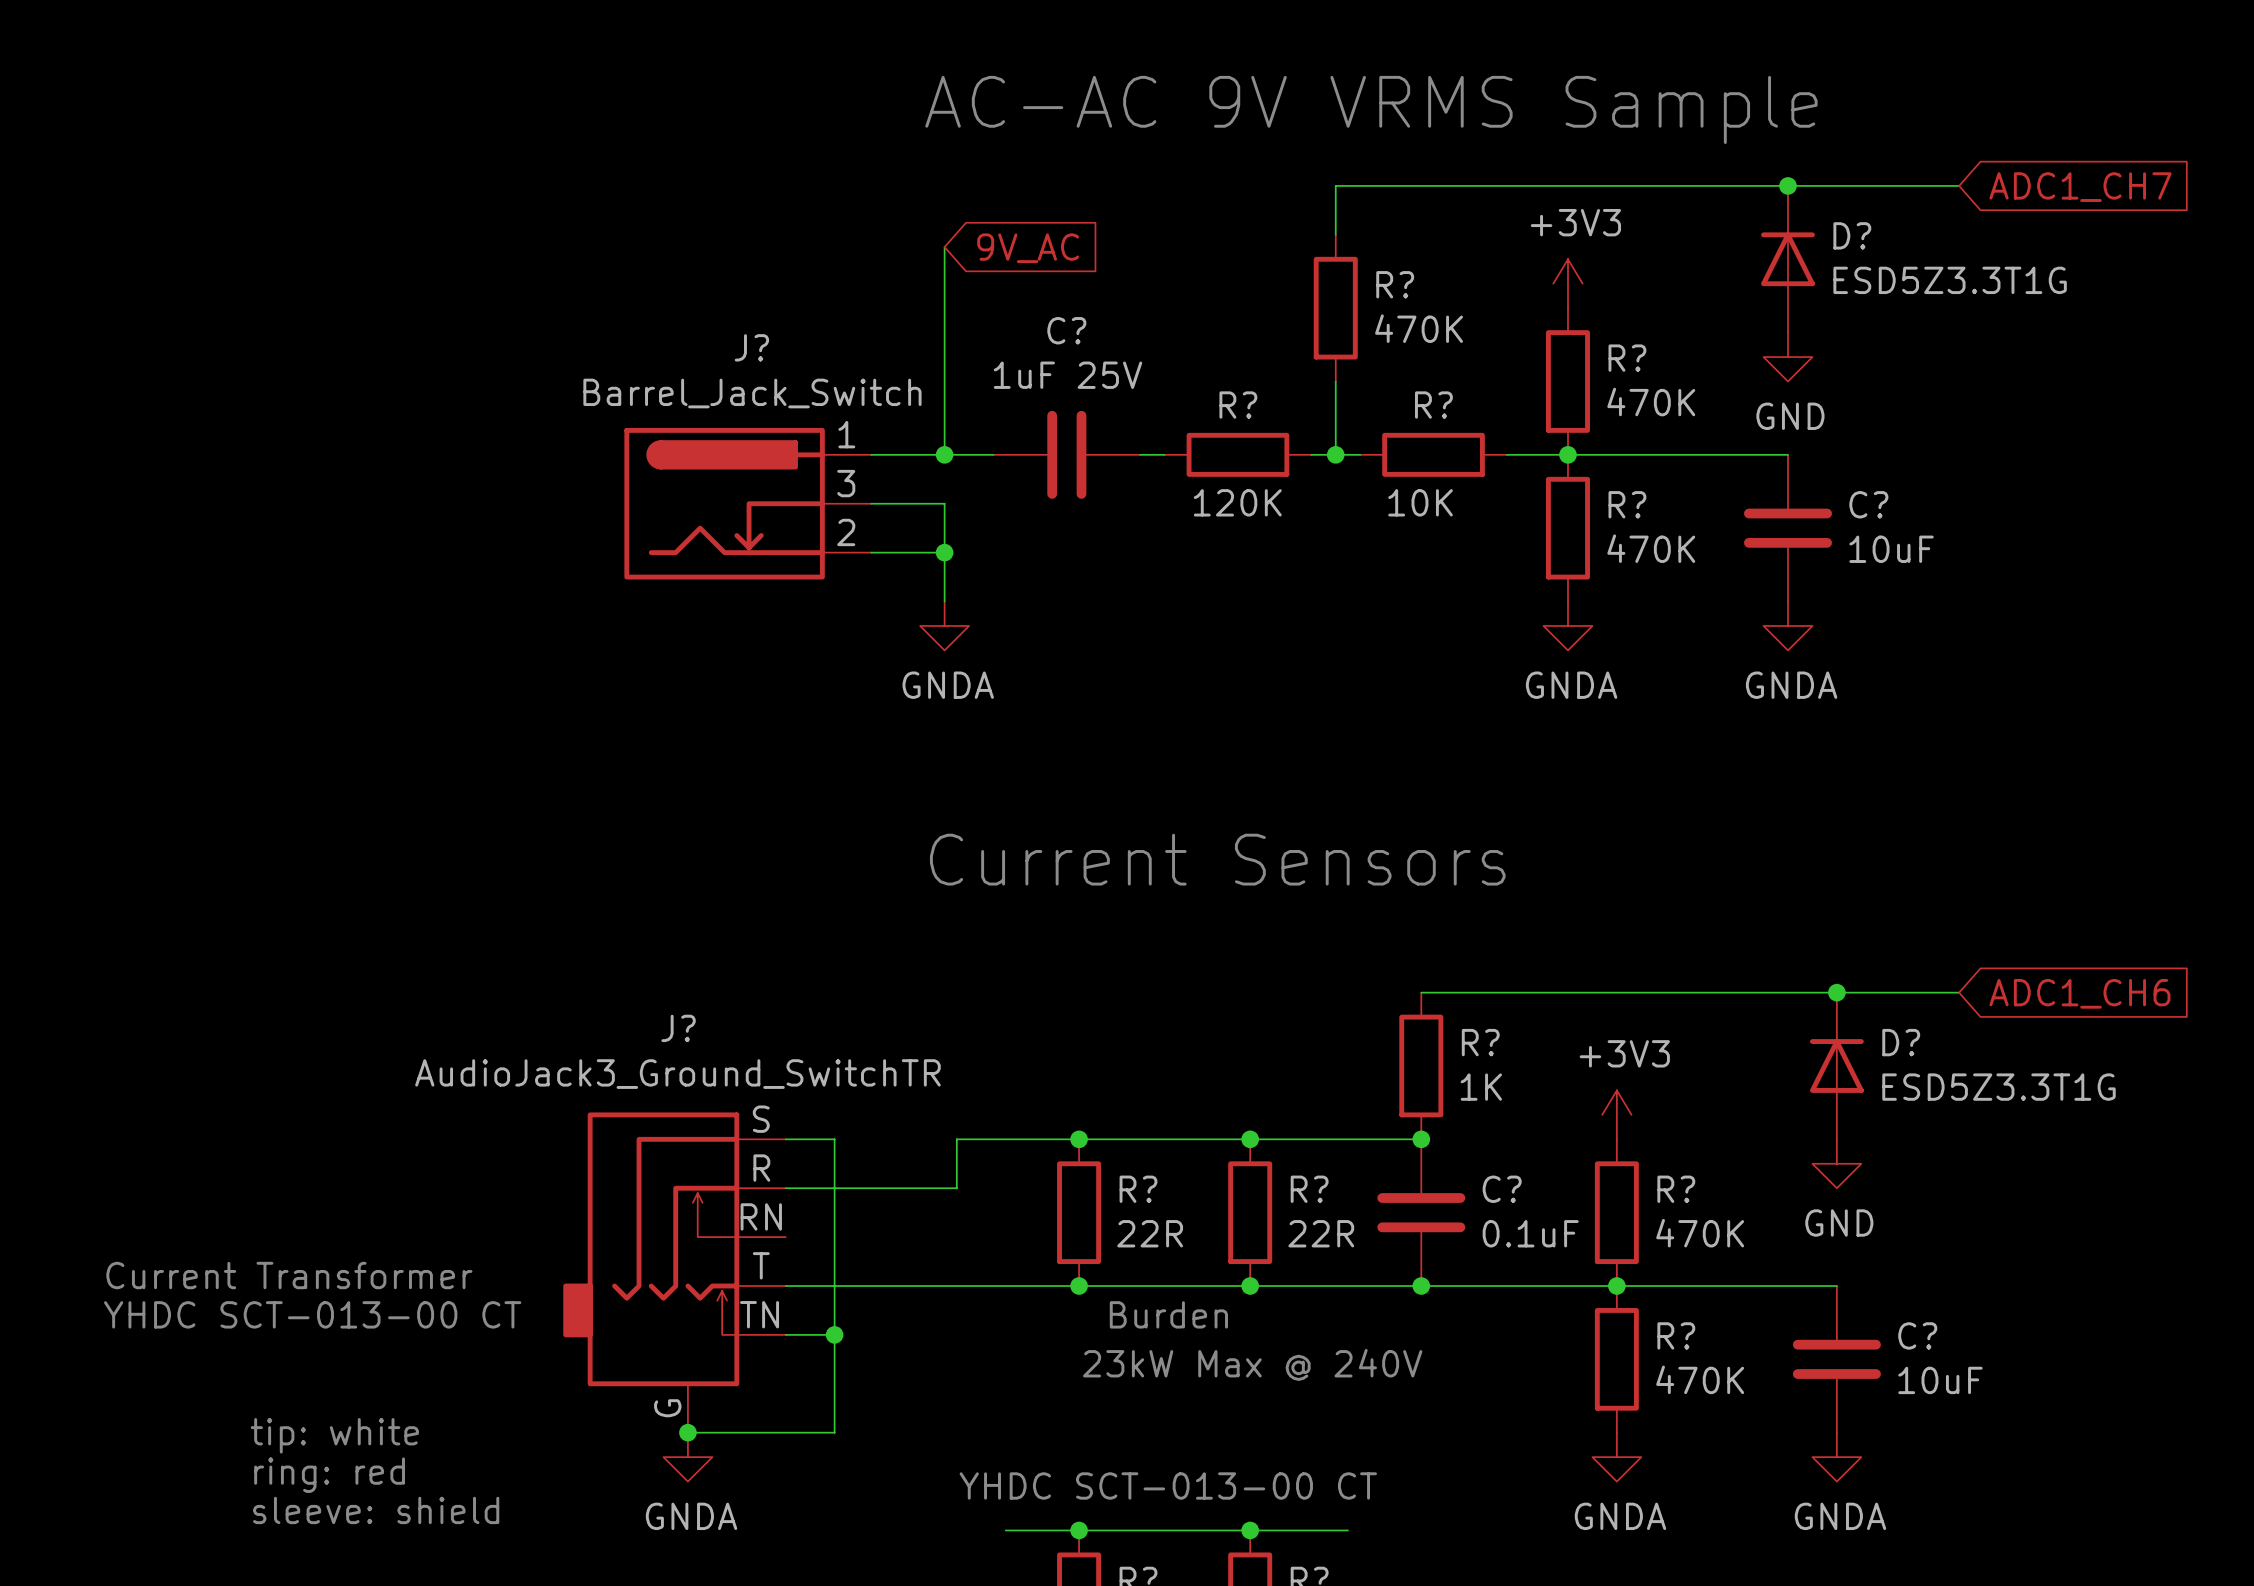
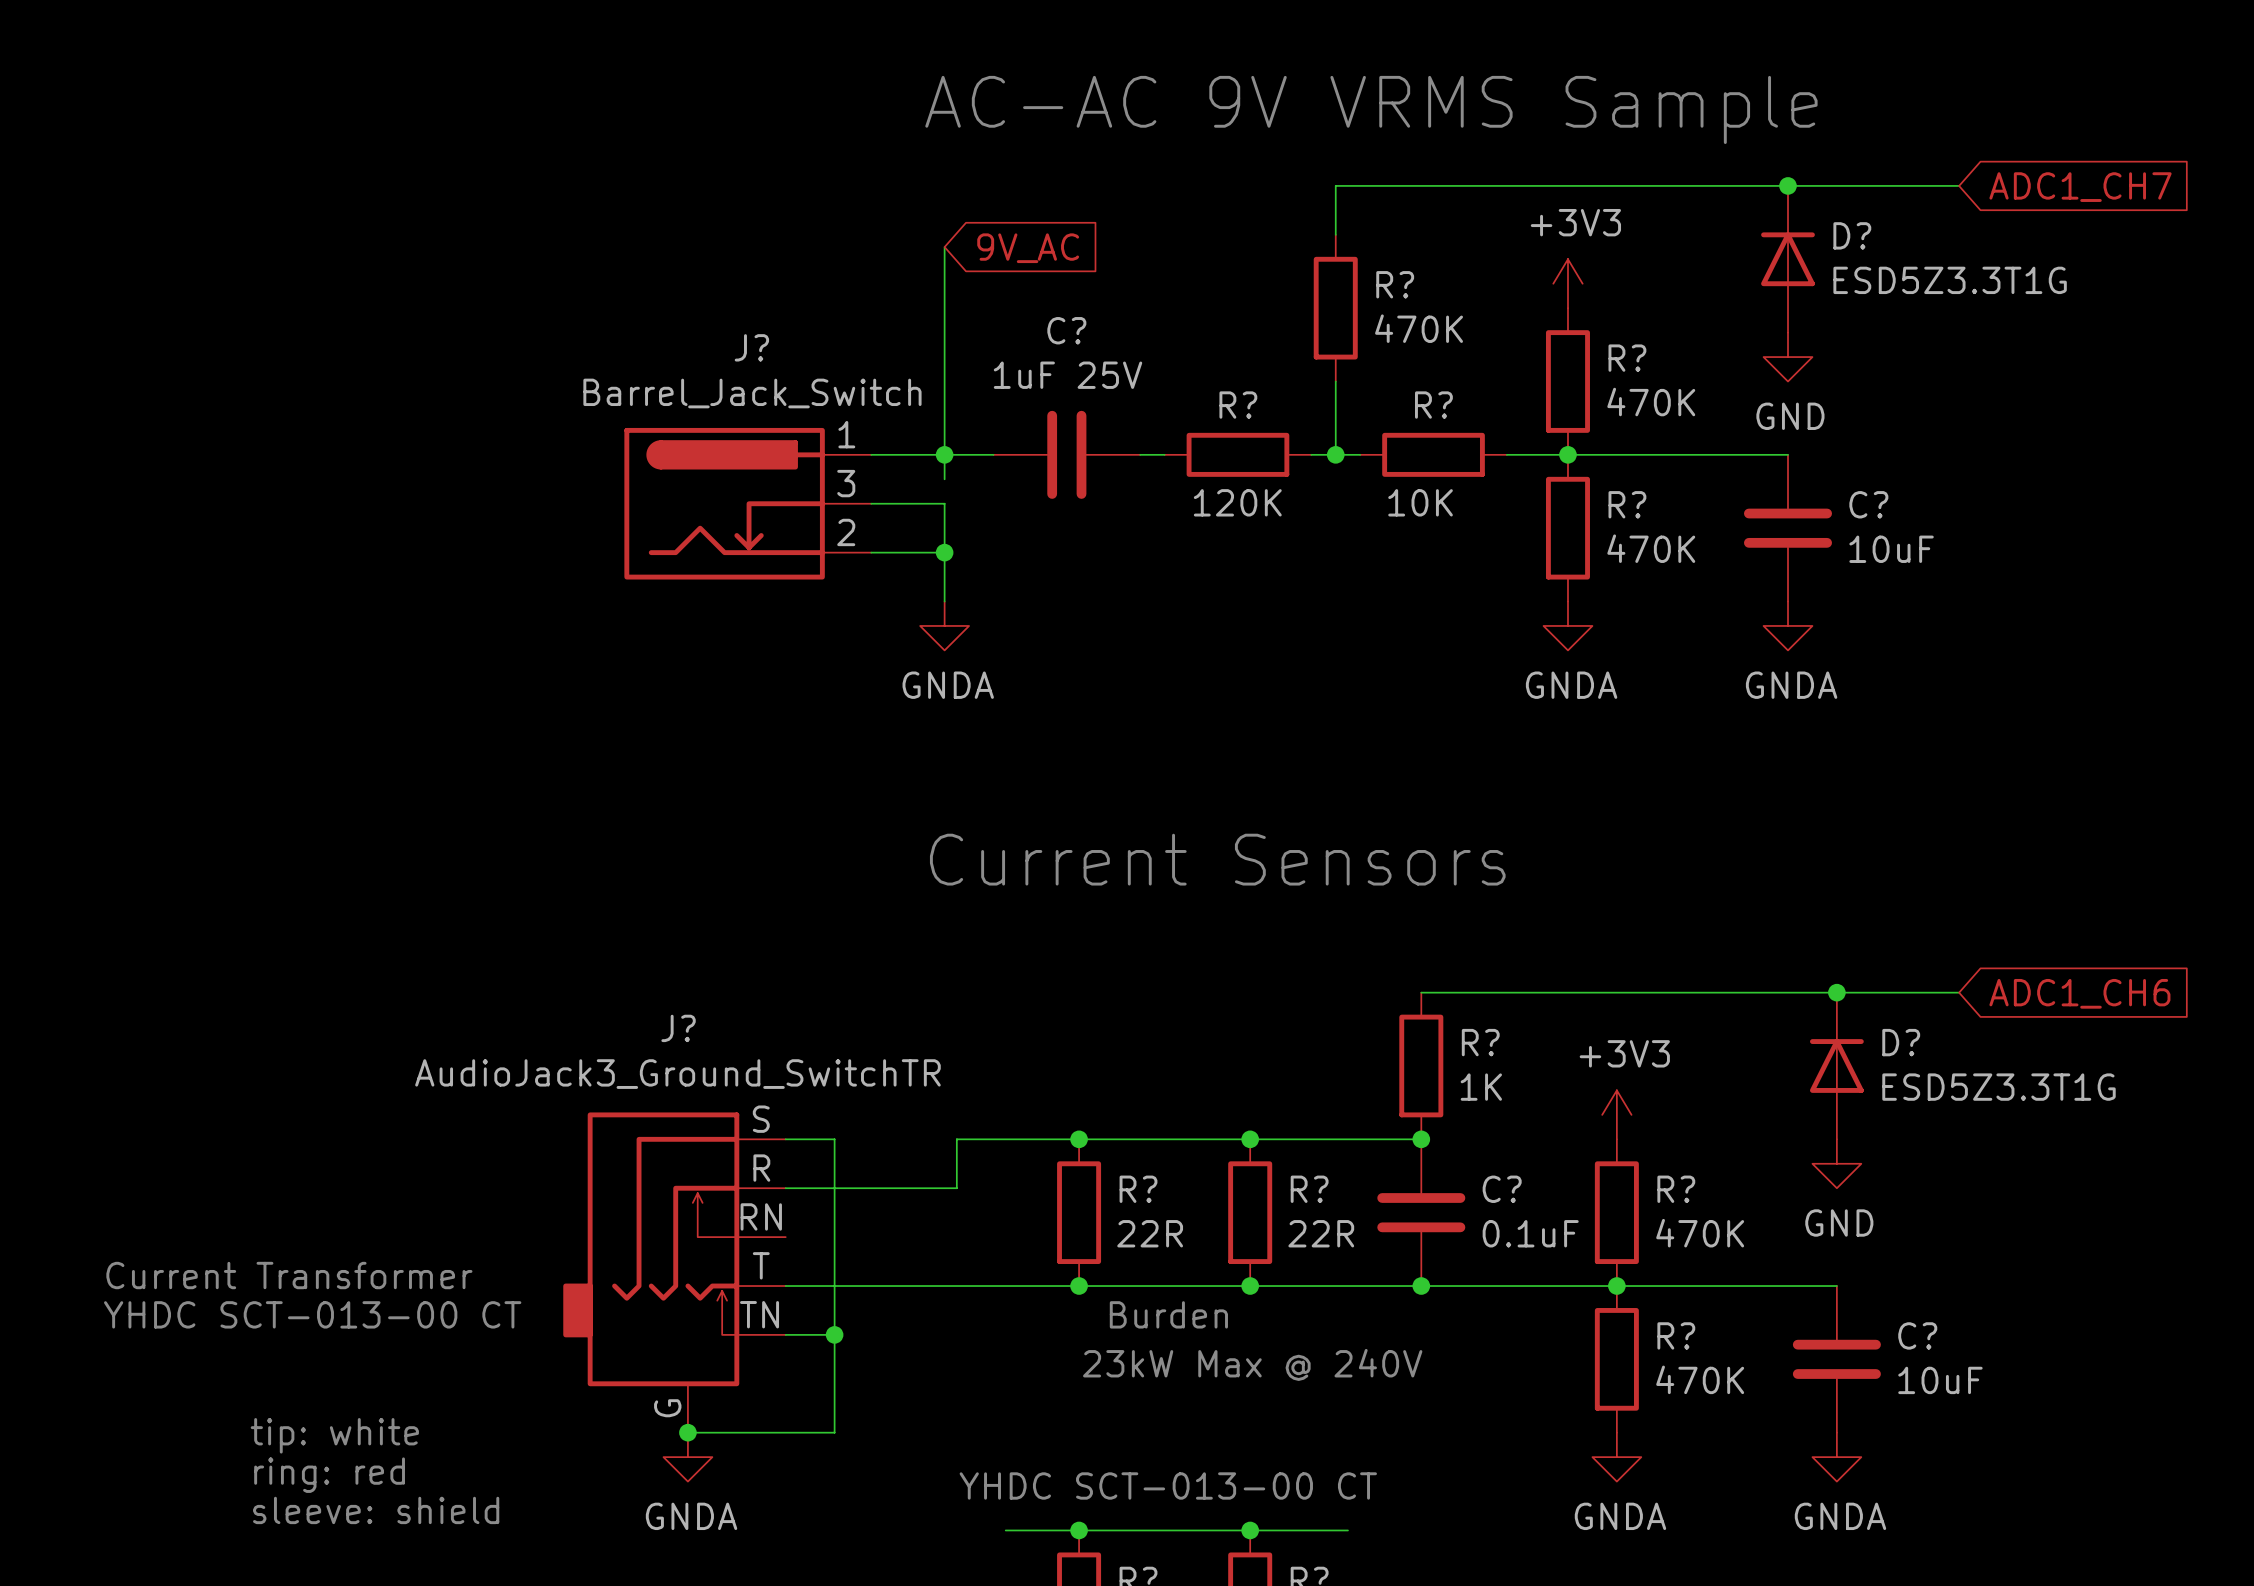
wire: none -> (944, 454) (944, 479)

